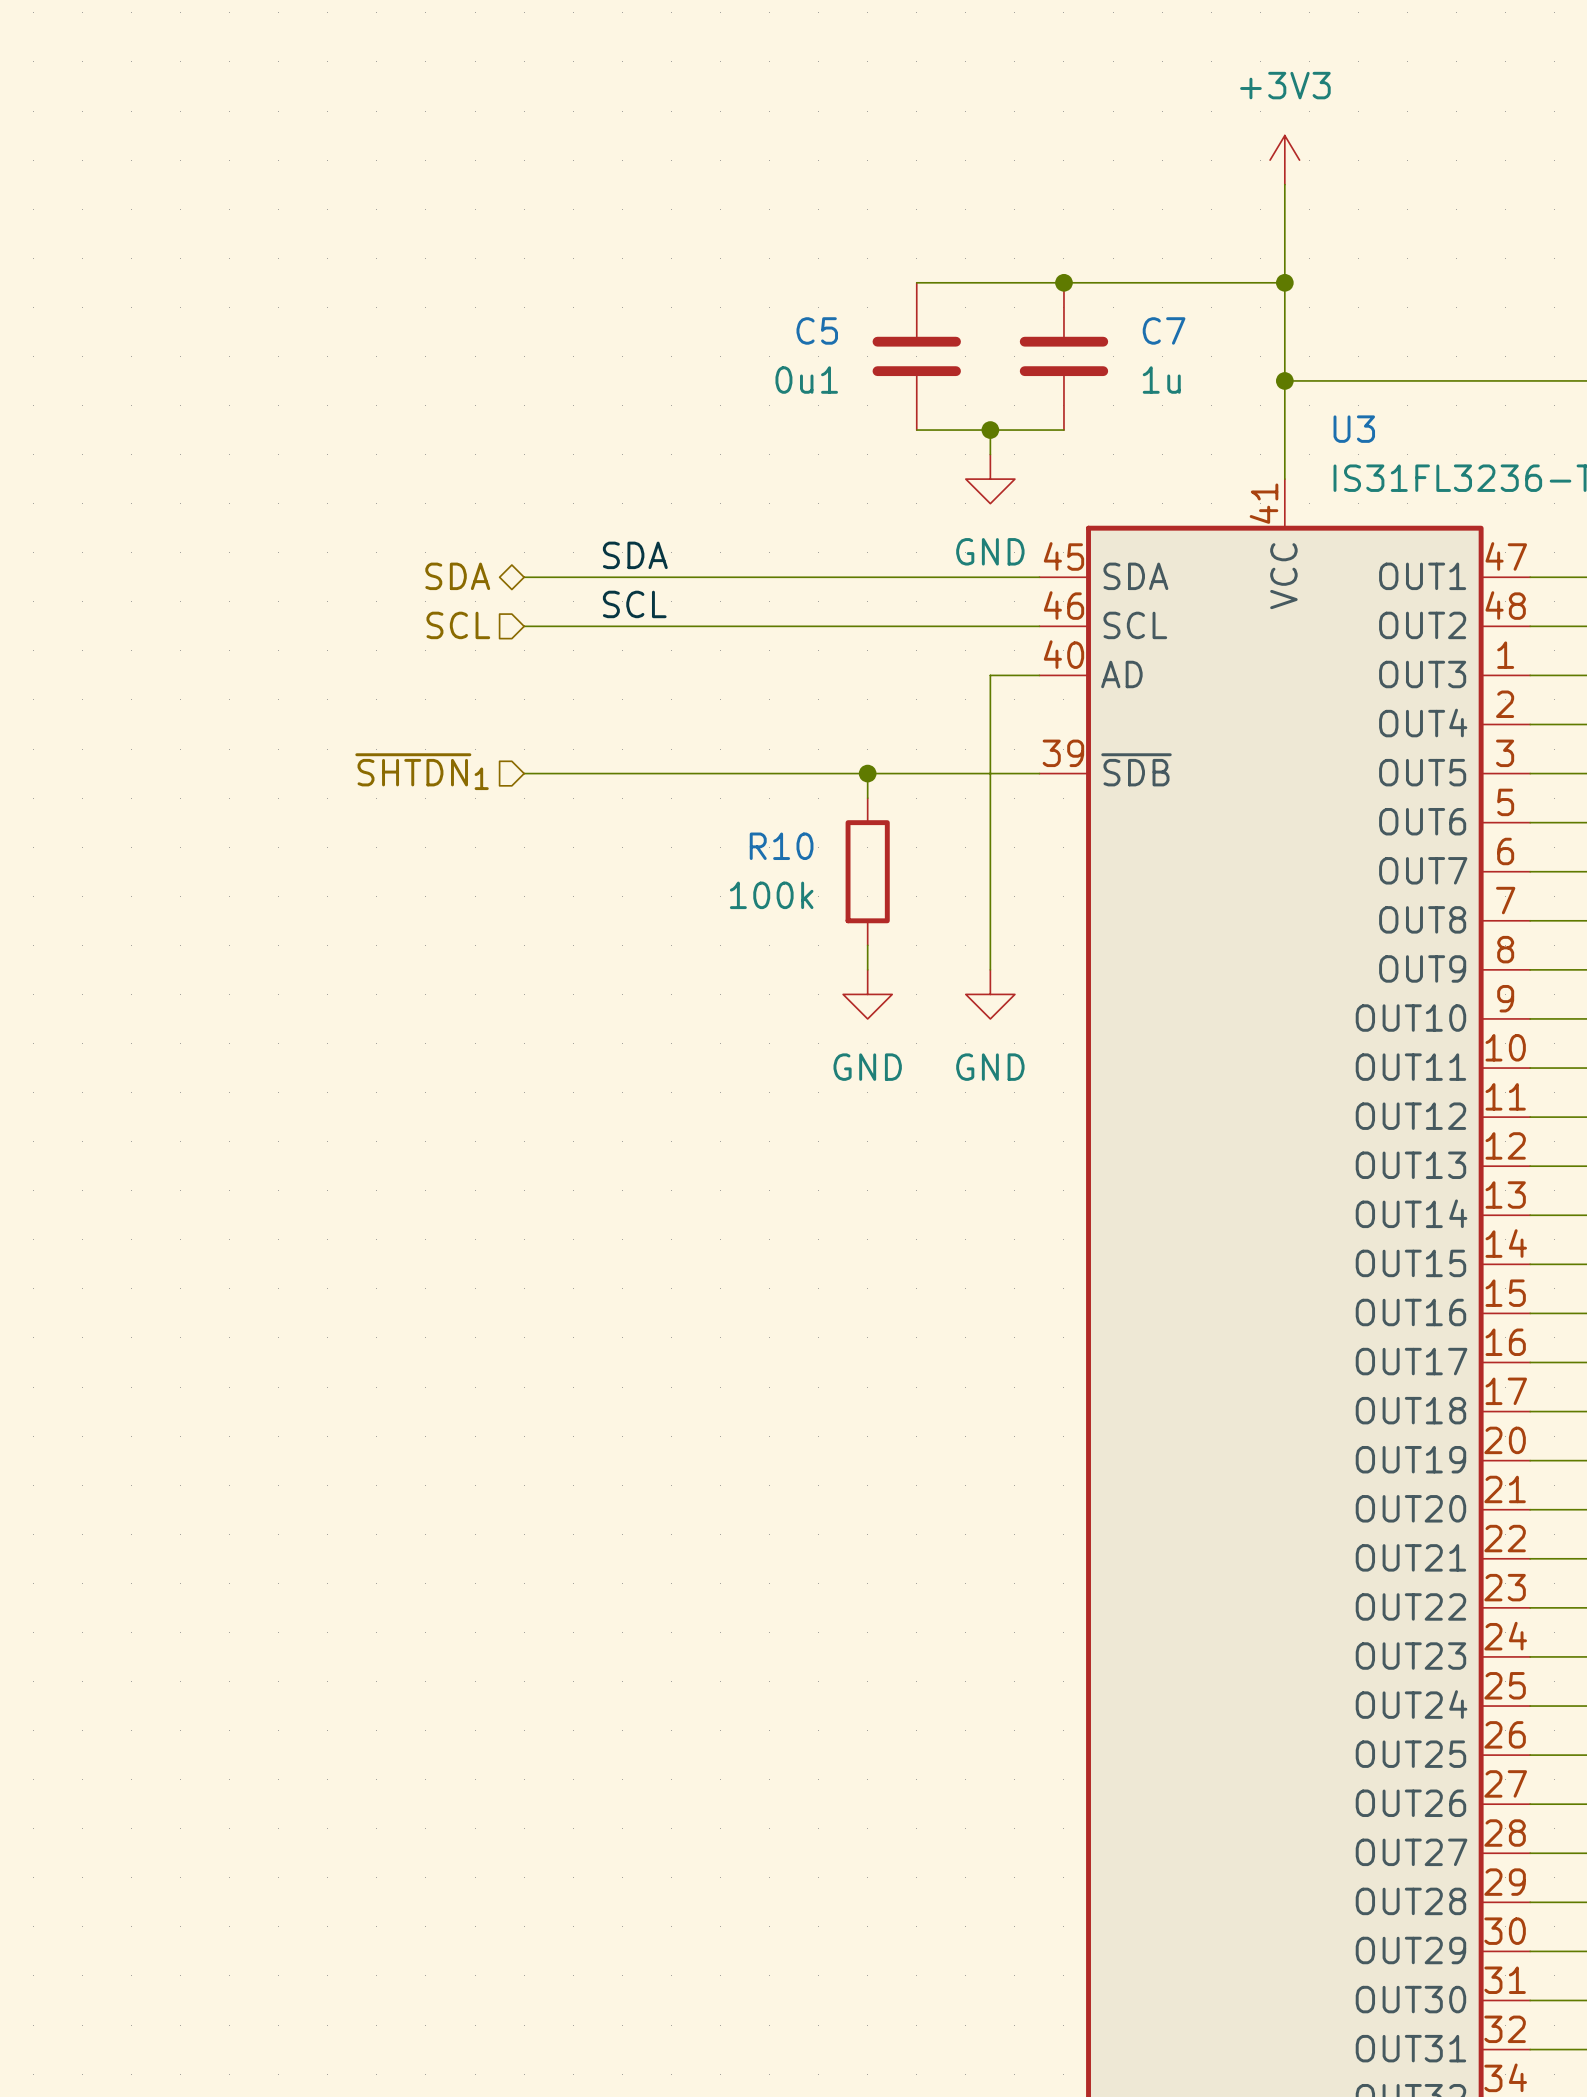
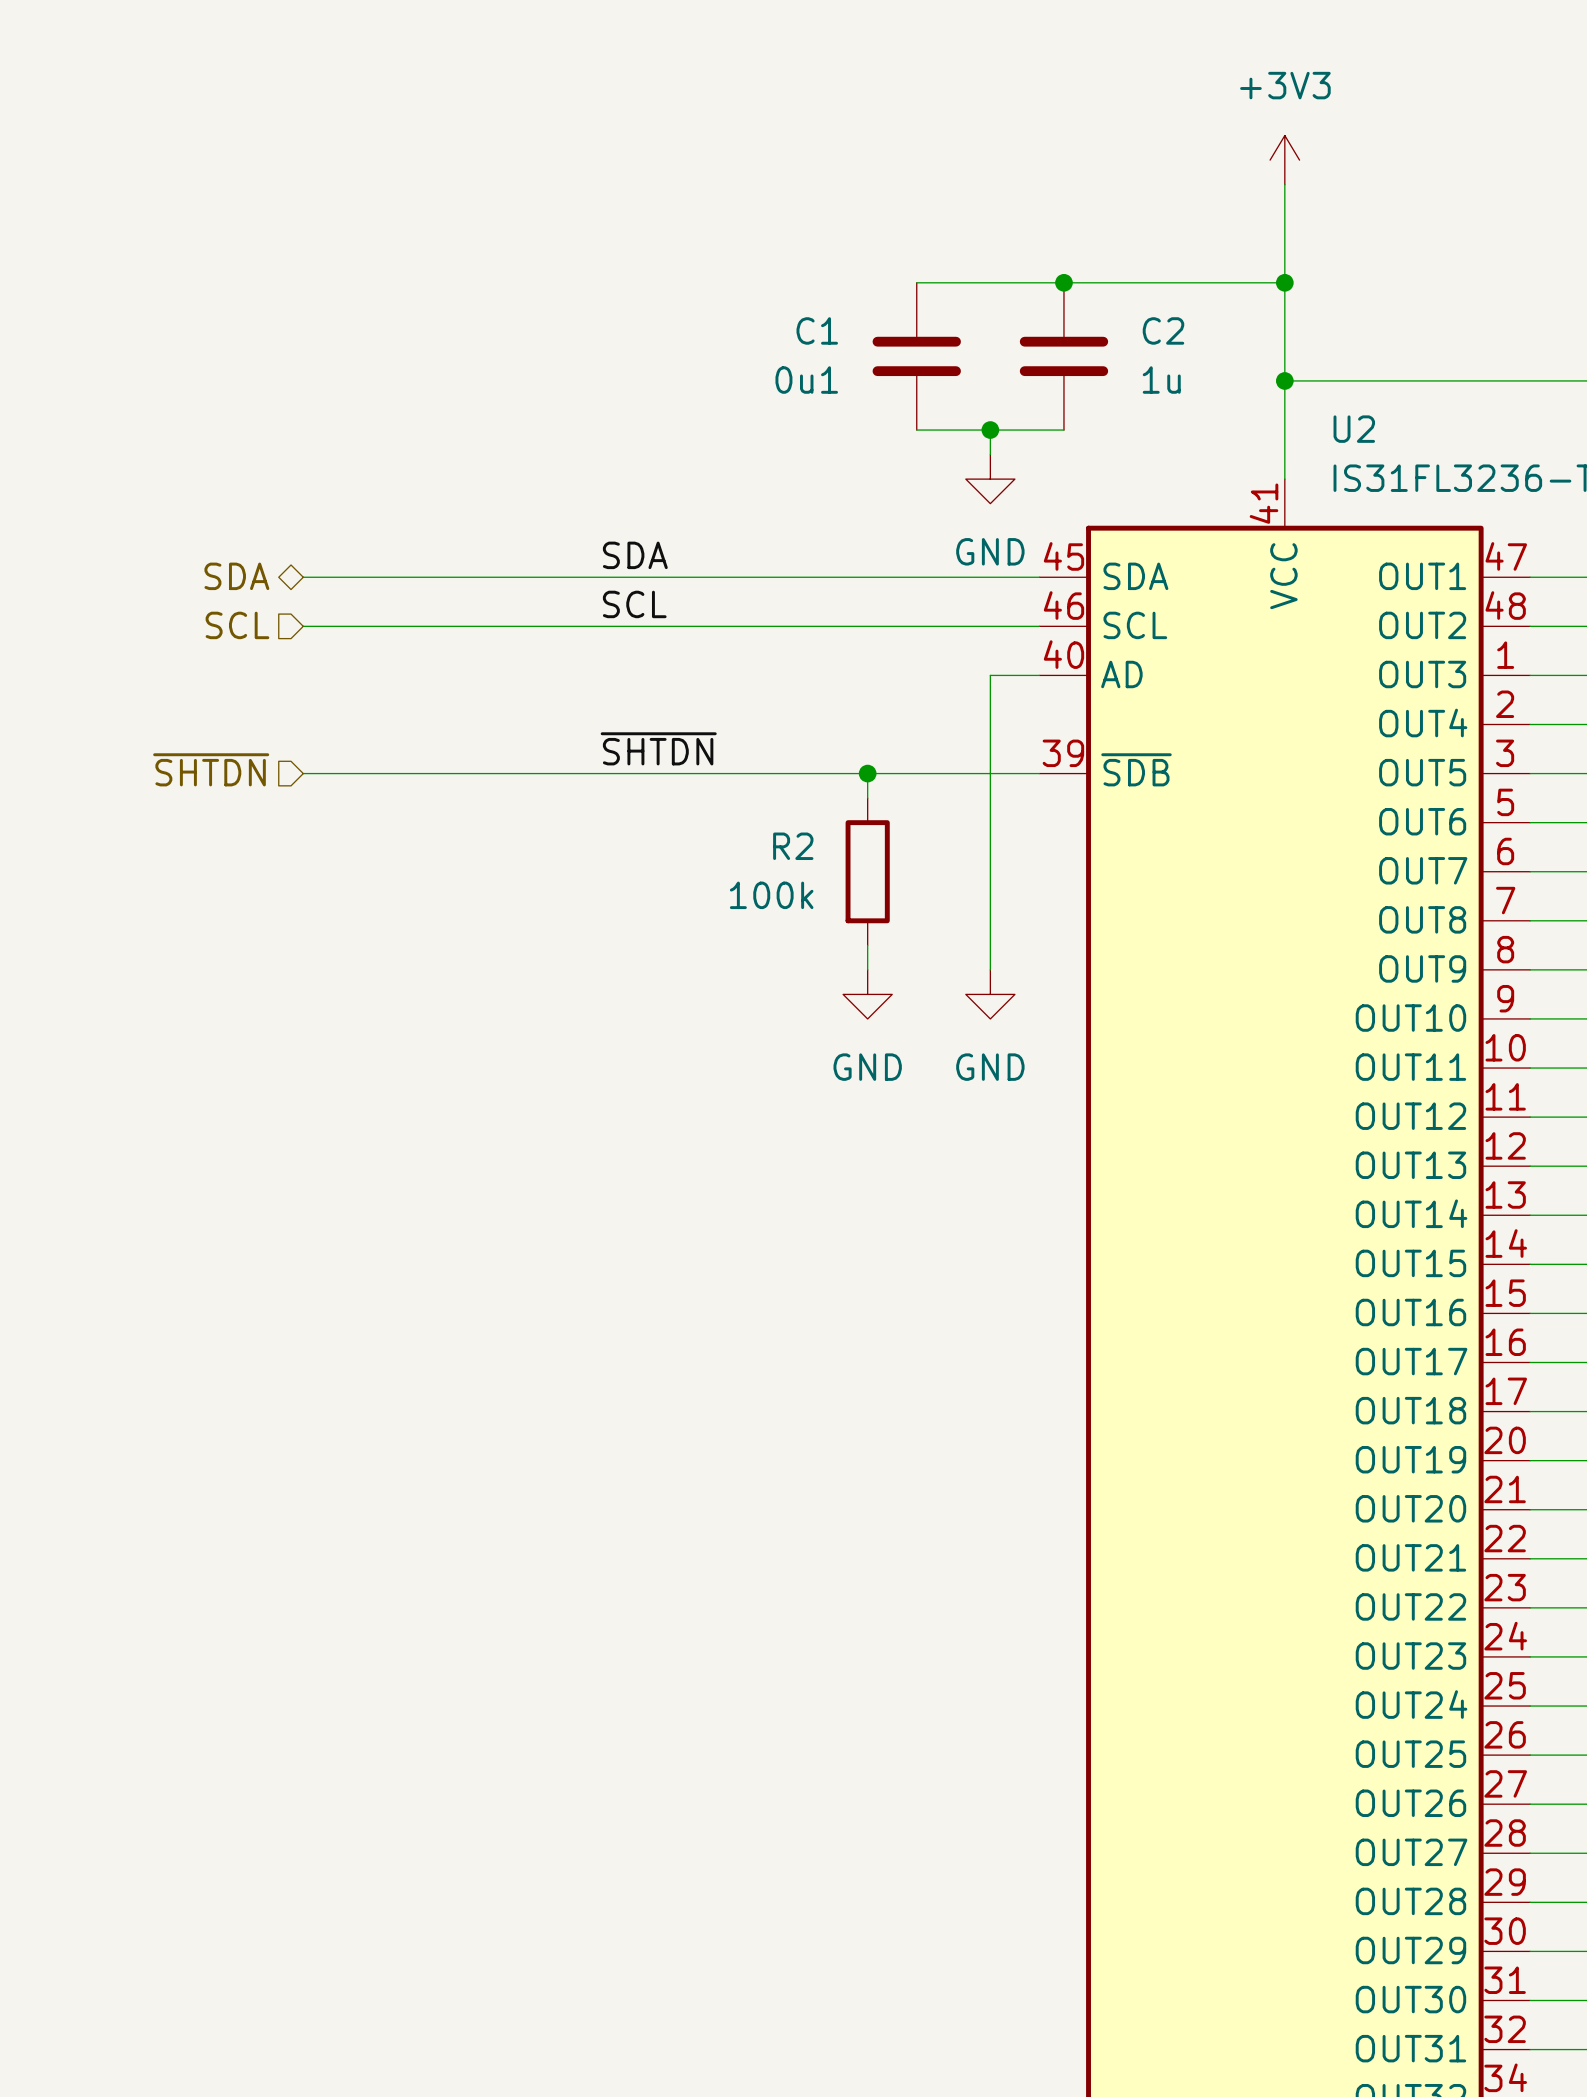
C5 name: C5 (817, 330) -> C1 (817, 330)
C7 name: C7 (1164, 330) -> C2 (1163, 330)
U3 name: U3 (1354, 429) -> U2 (1354, 429)
hierarchical label position: SDA (457, 576) -> SDA (236, 576)
wire: none -> (303, 577) (524, 577)
hierarchical label position: SCL (458, 625) -> SCL (237, 625)
wire: none -> (303, 626) (524, 626)
label: none -> ~{SHTDN} (658, 748)
hierarchical label: ~{SHTDN}1 (422, 771) -> ~{SHTDN} (211, 769)
wire: none -> (303, 773) (524, 773)
R10 name: R10 (781, 846) -> R2 (793, 846)

